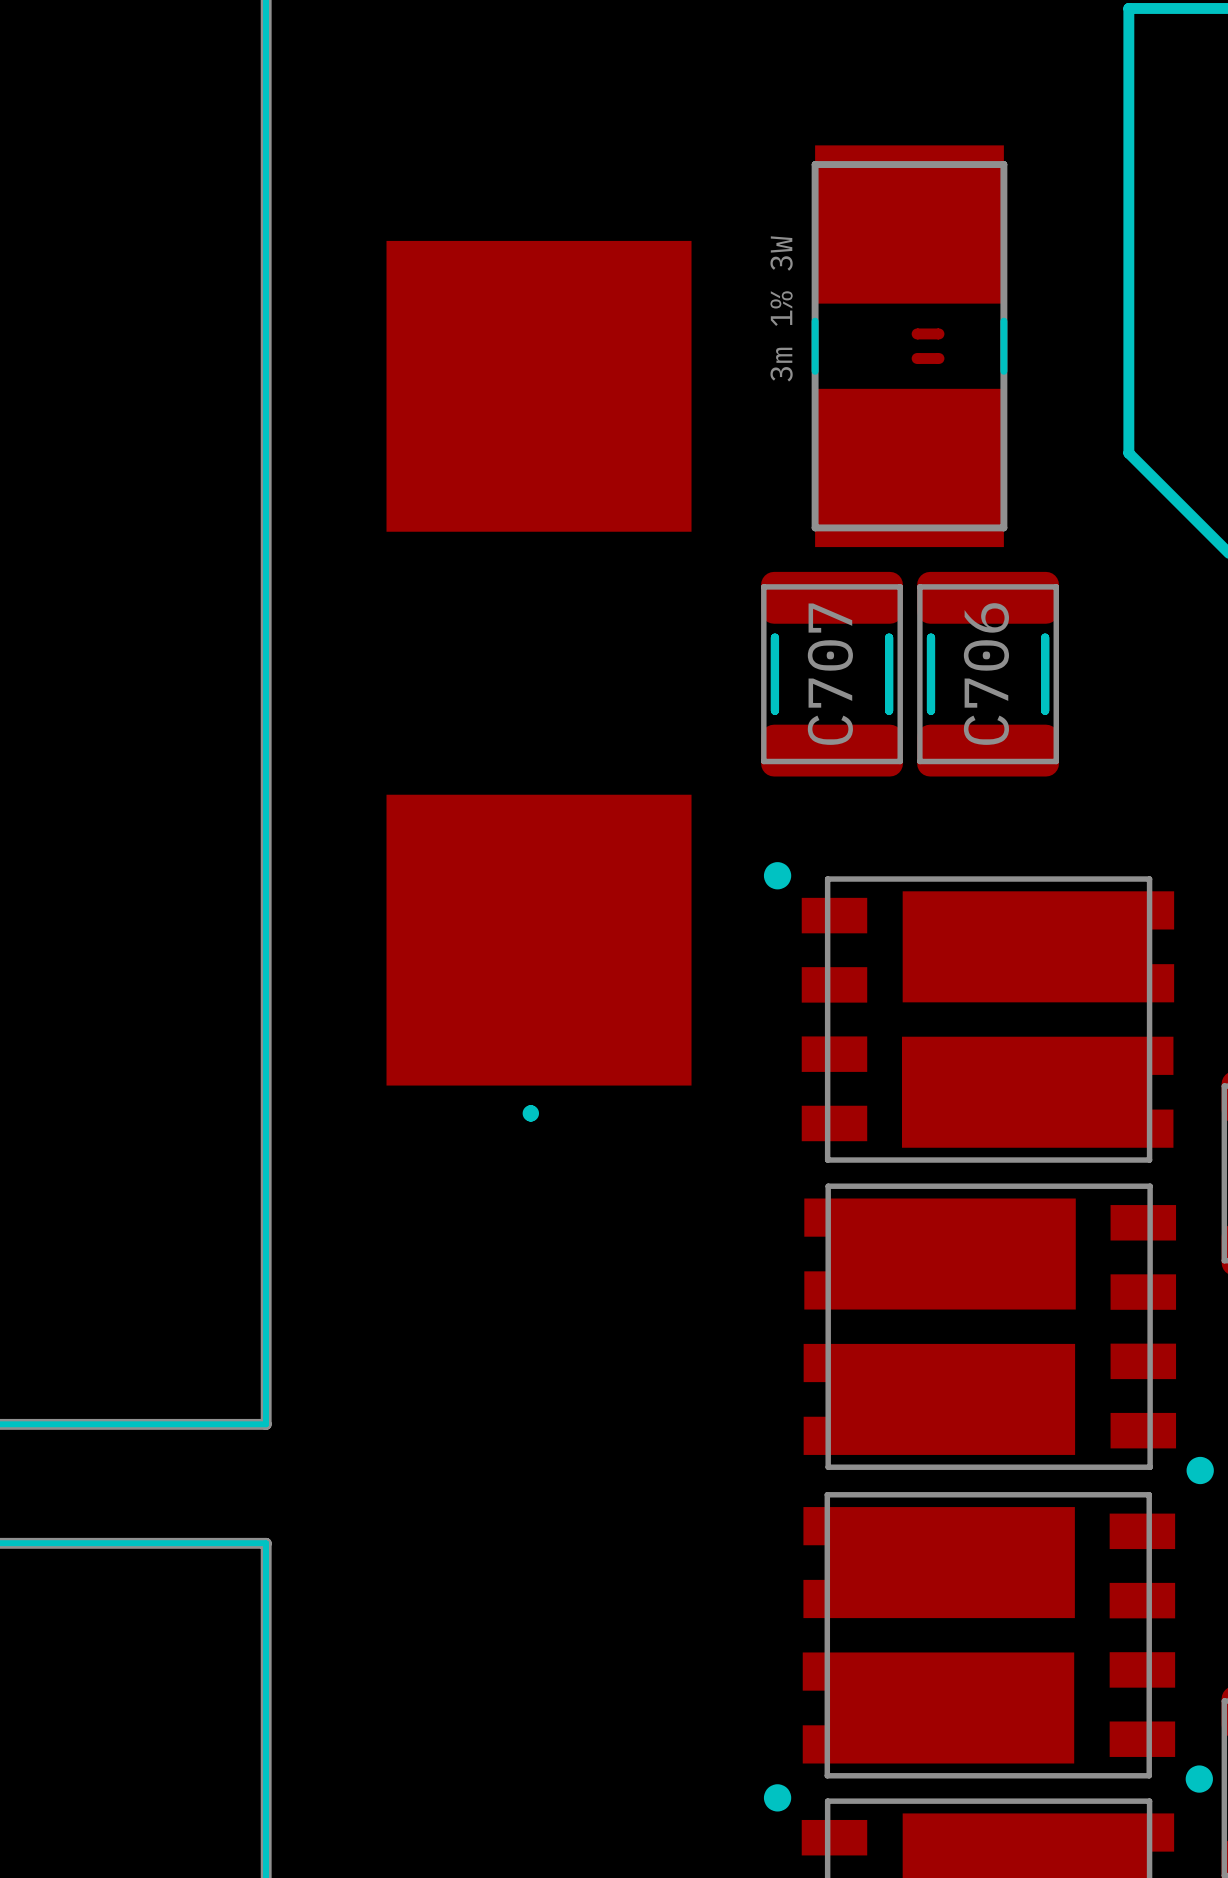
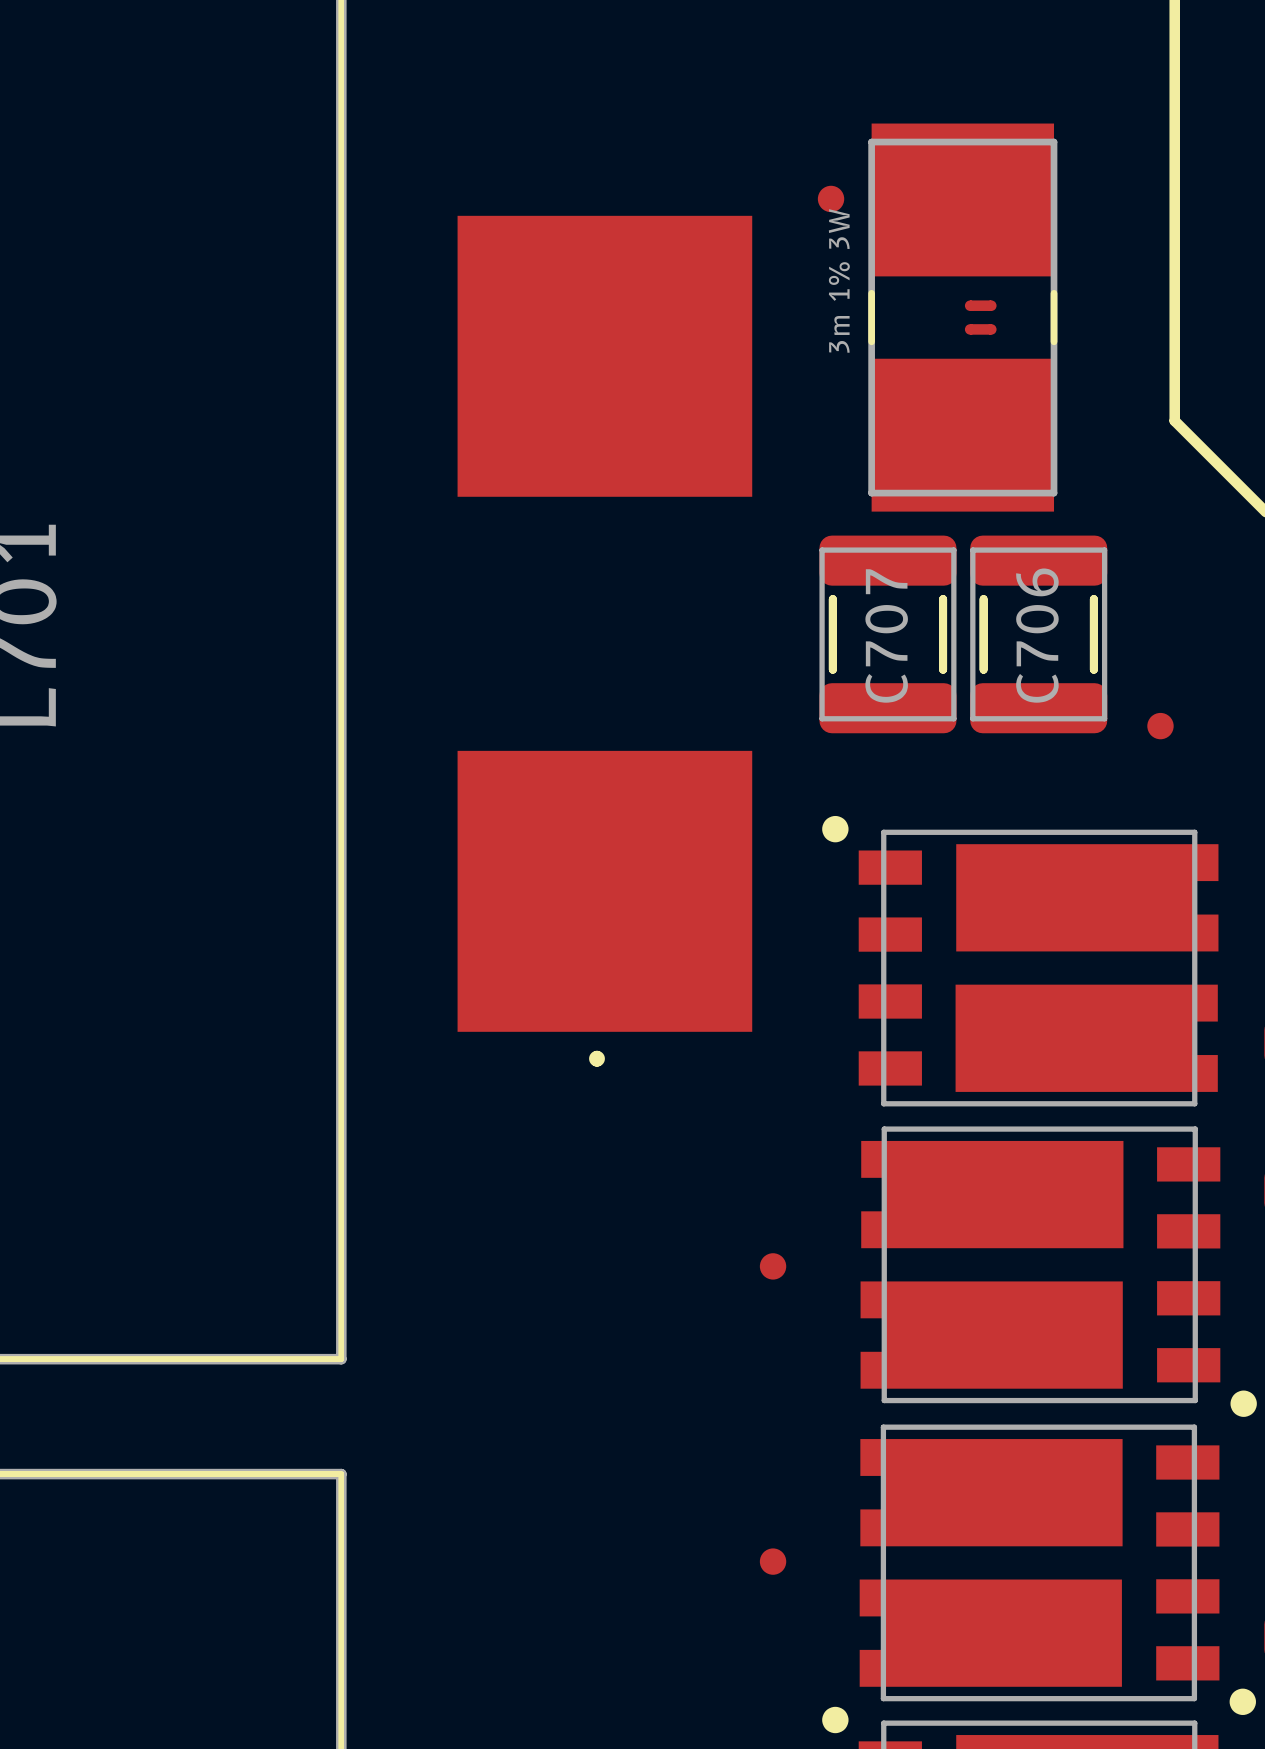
part: none -> (831, 198)
part: none -> (1160, 726)
part: none -> (773, 1266)
part: none -> (773, 1561)

